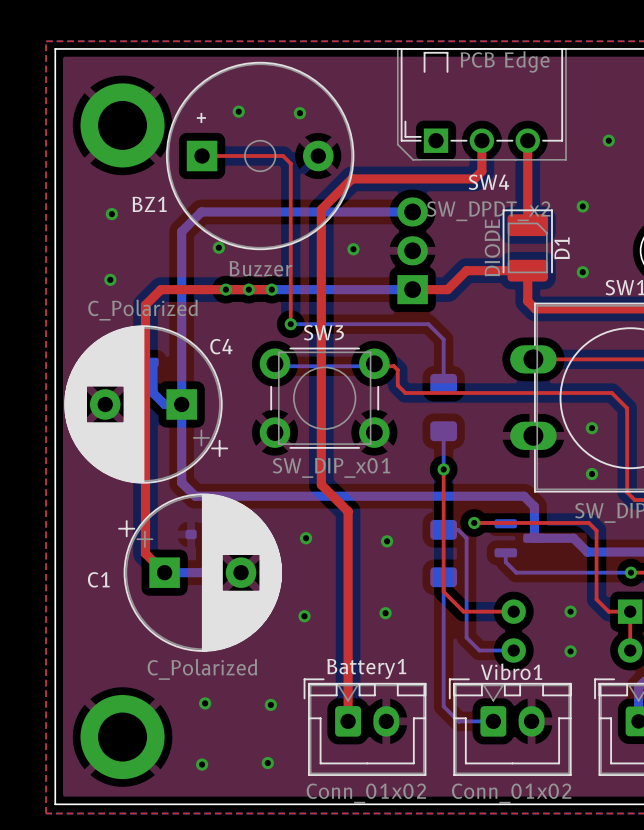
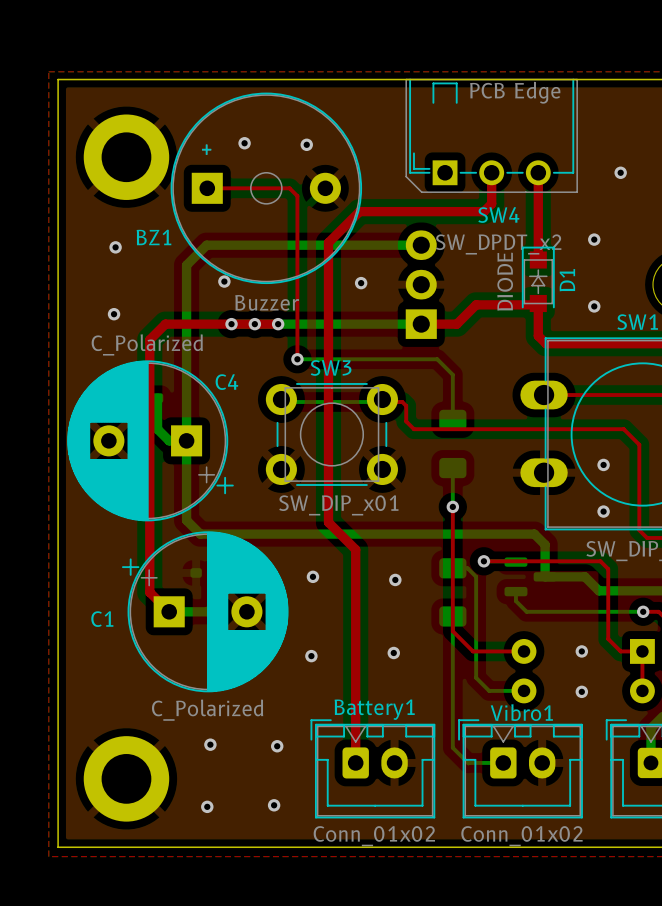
D1 footprint: [502, 209, 553, 282] -> [521, 246, 555, 313]

